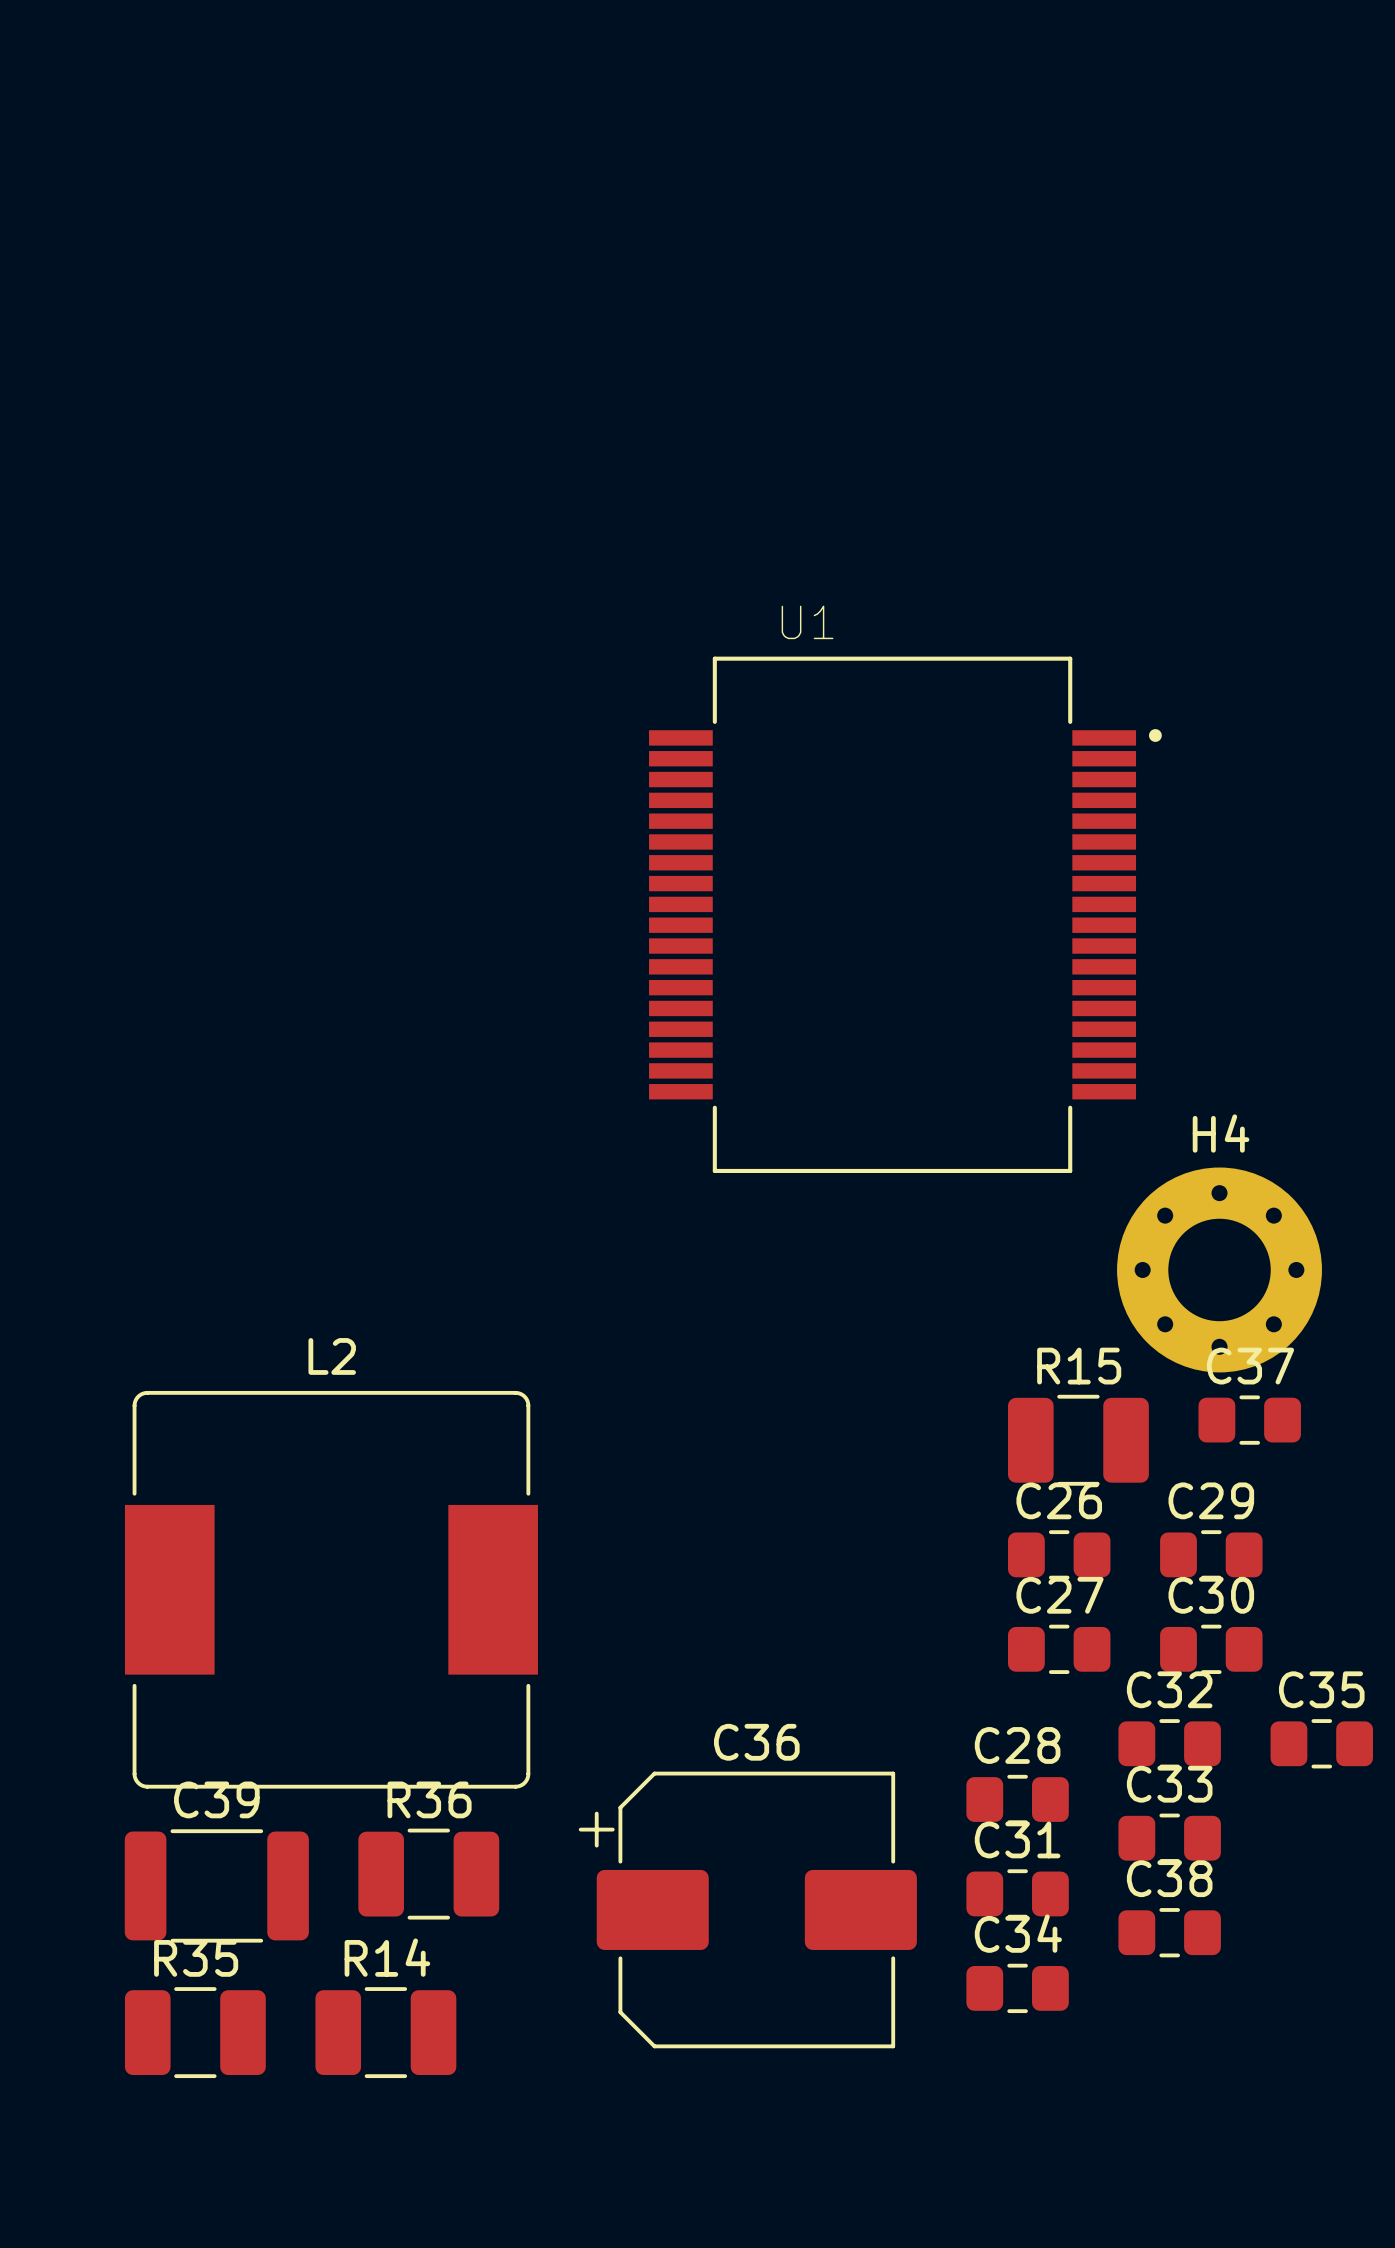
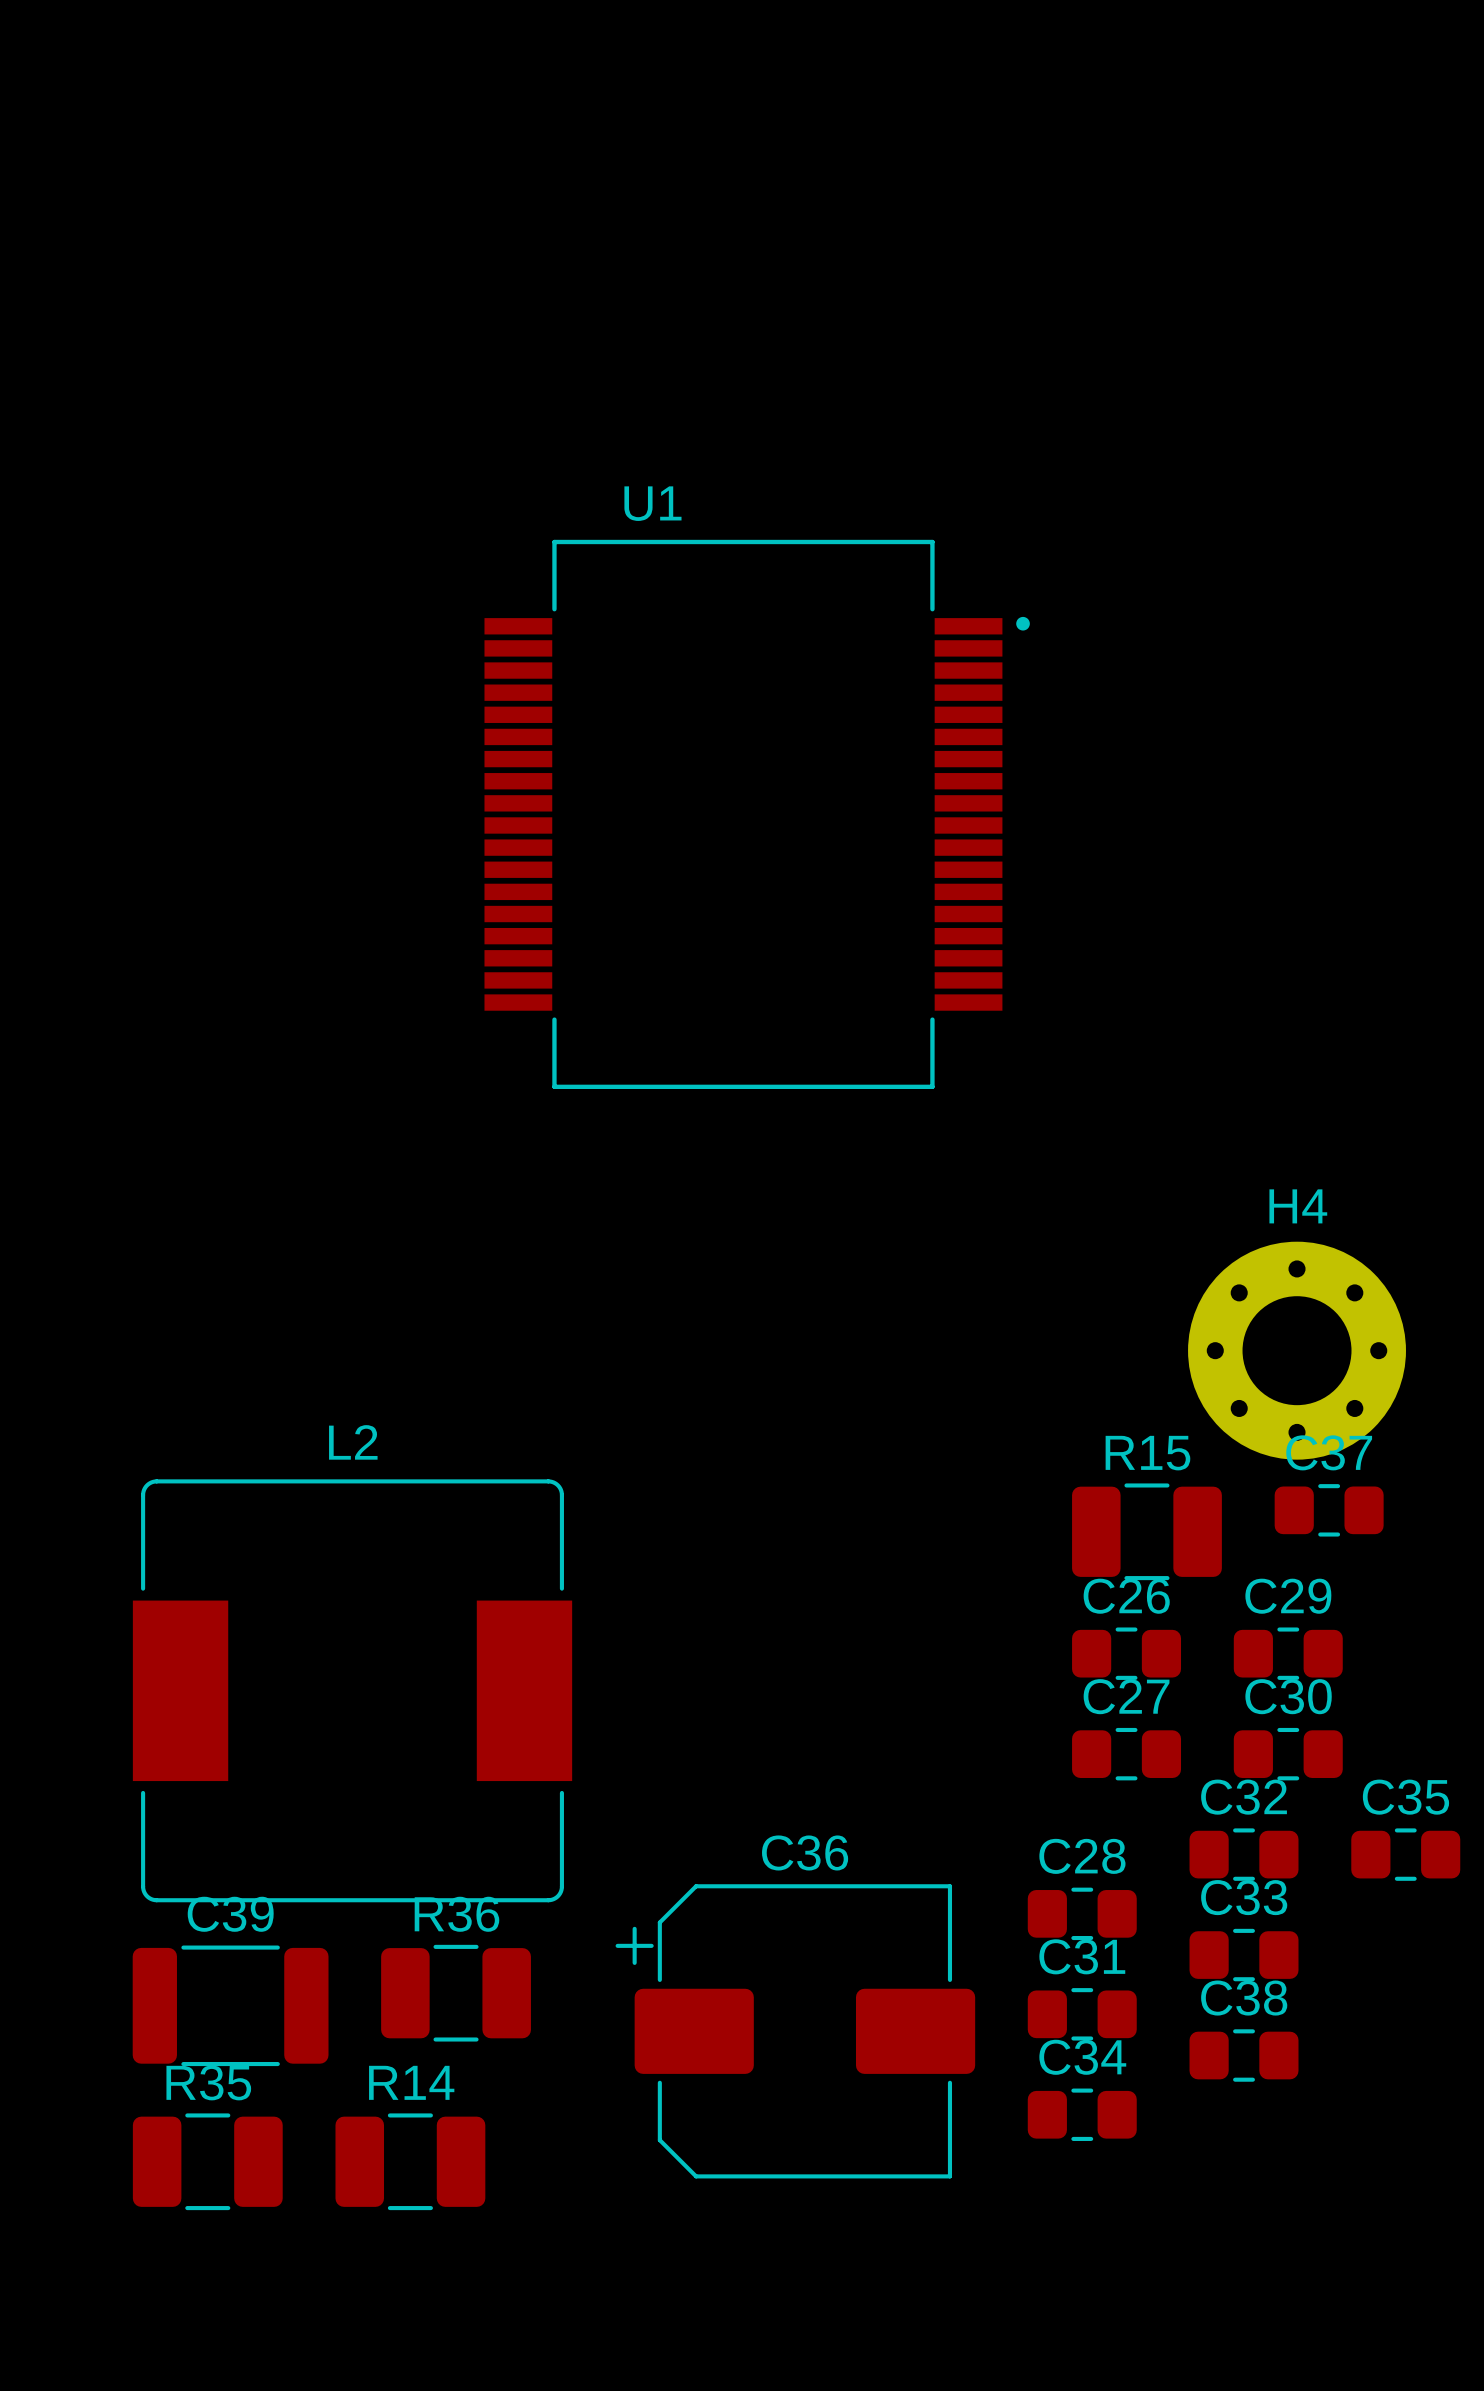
U1 position: (905, 914) -> (757, 814)

